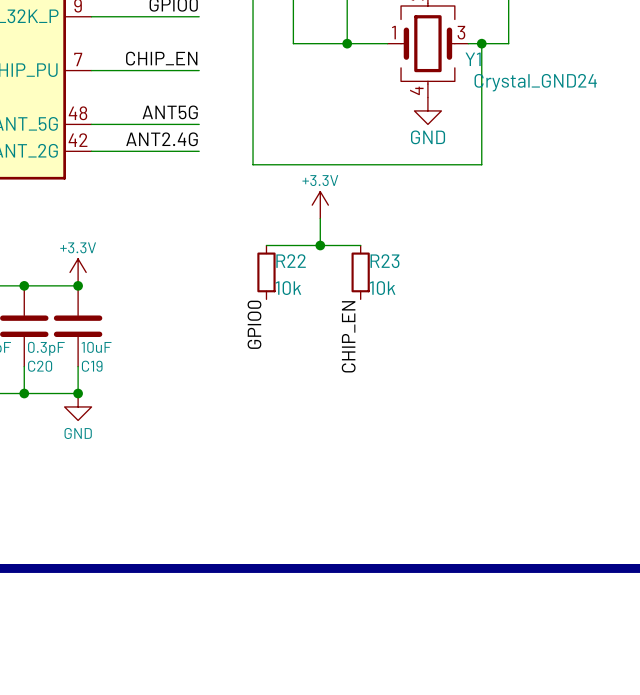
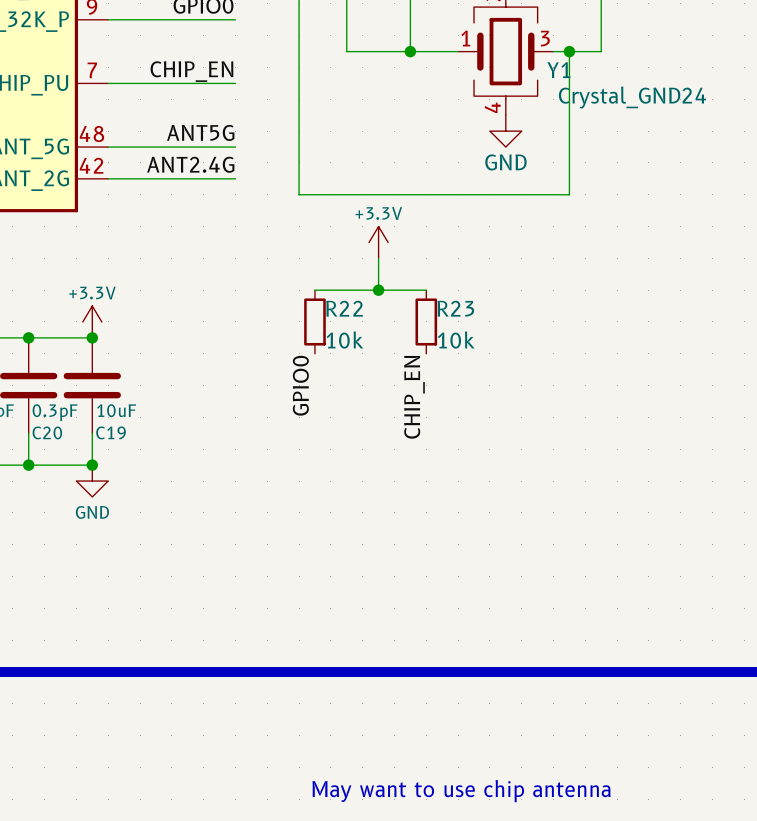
text: none -> May want to use chip antenna (461, 791)

